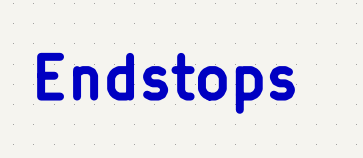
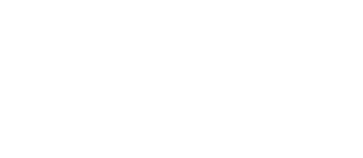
text: Endstops (166, 83) -> none

